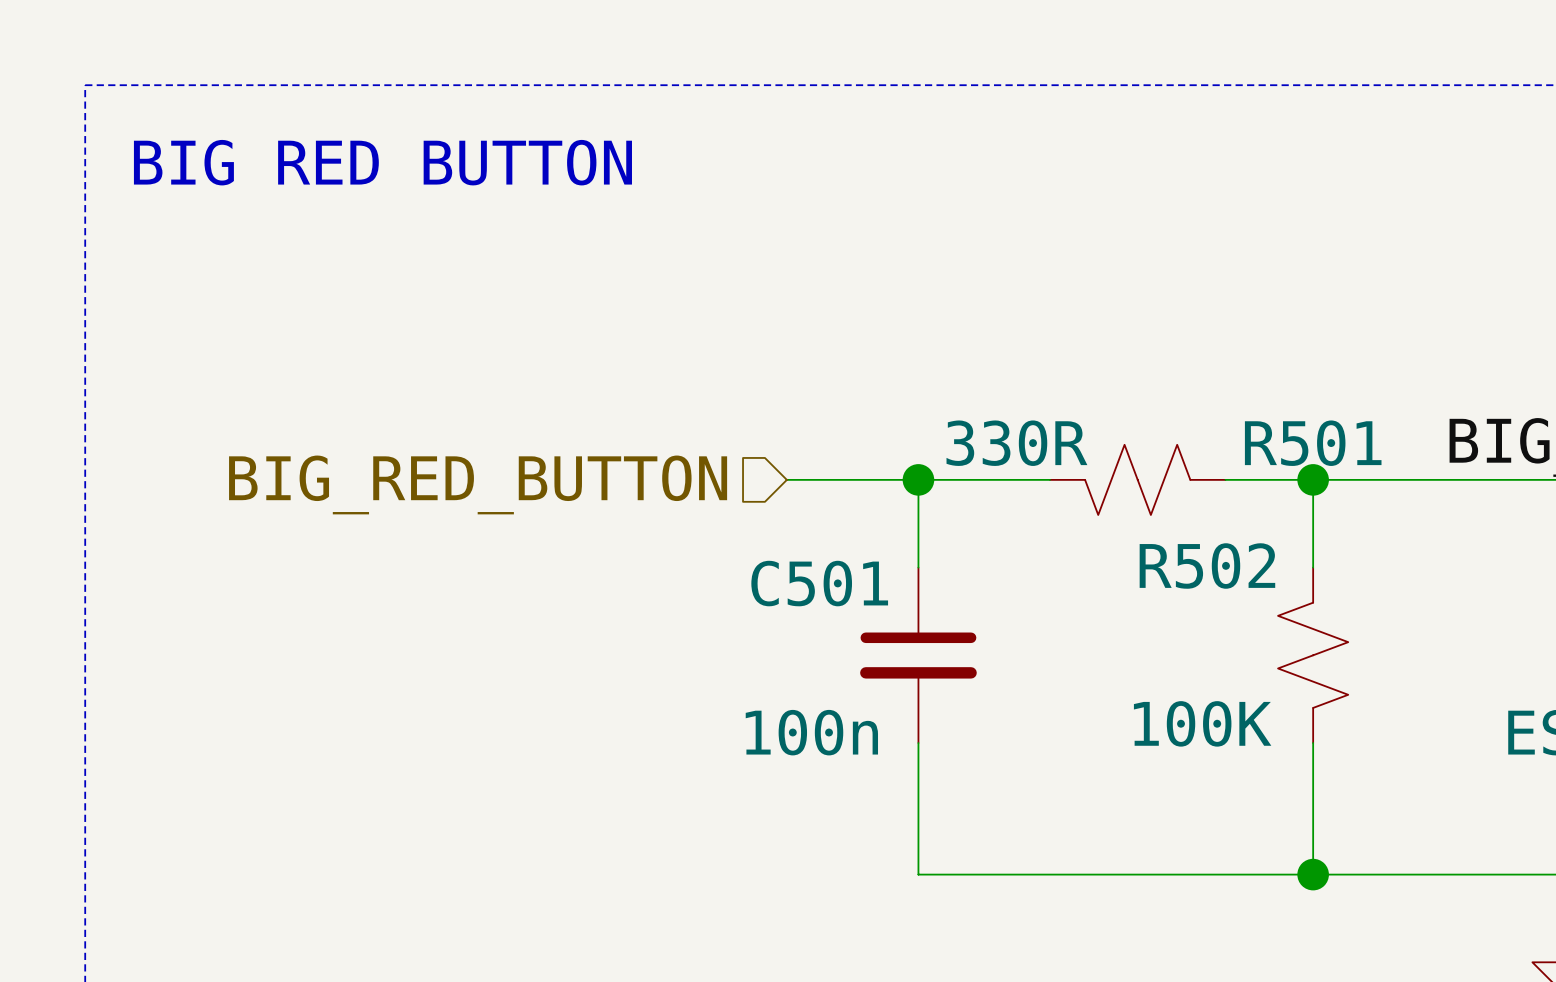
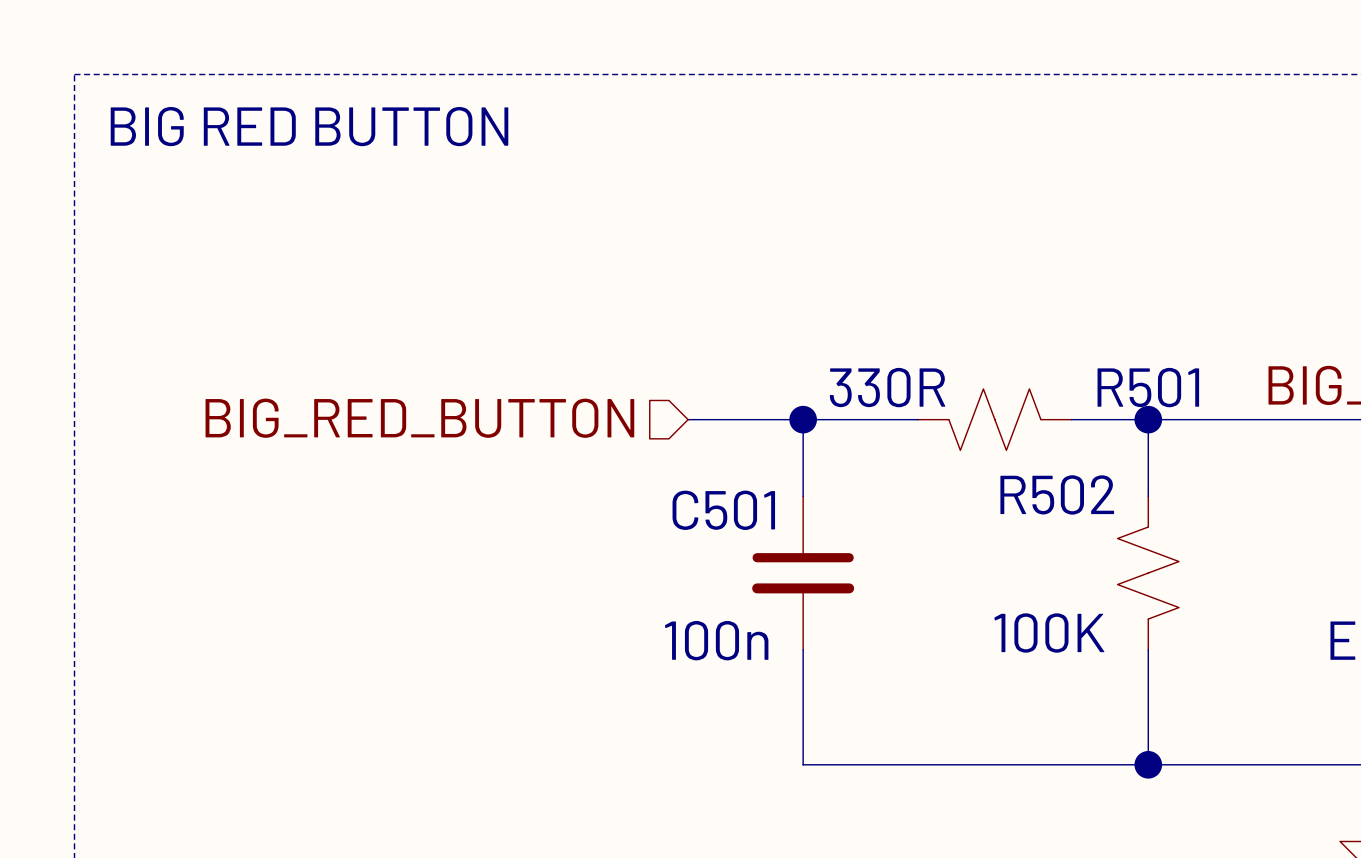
text position: BIG RED BUTTON (382, 162) -> BIG RED BUTTON (309, 126)

